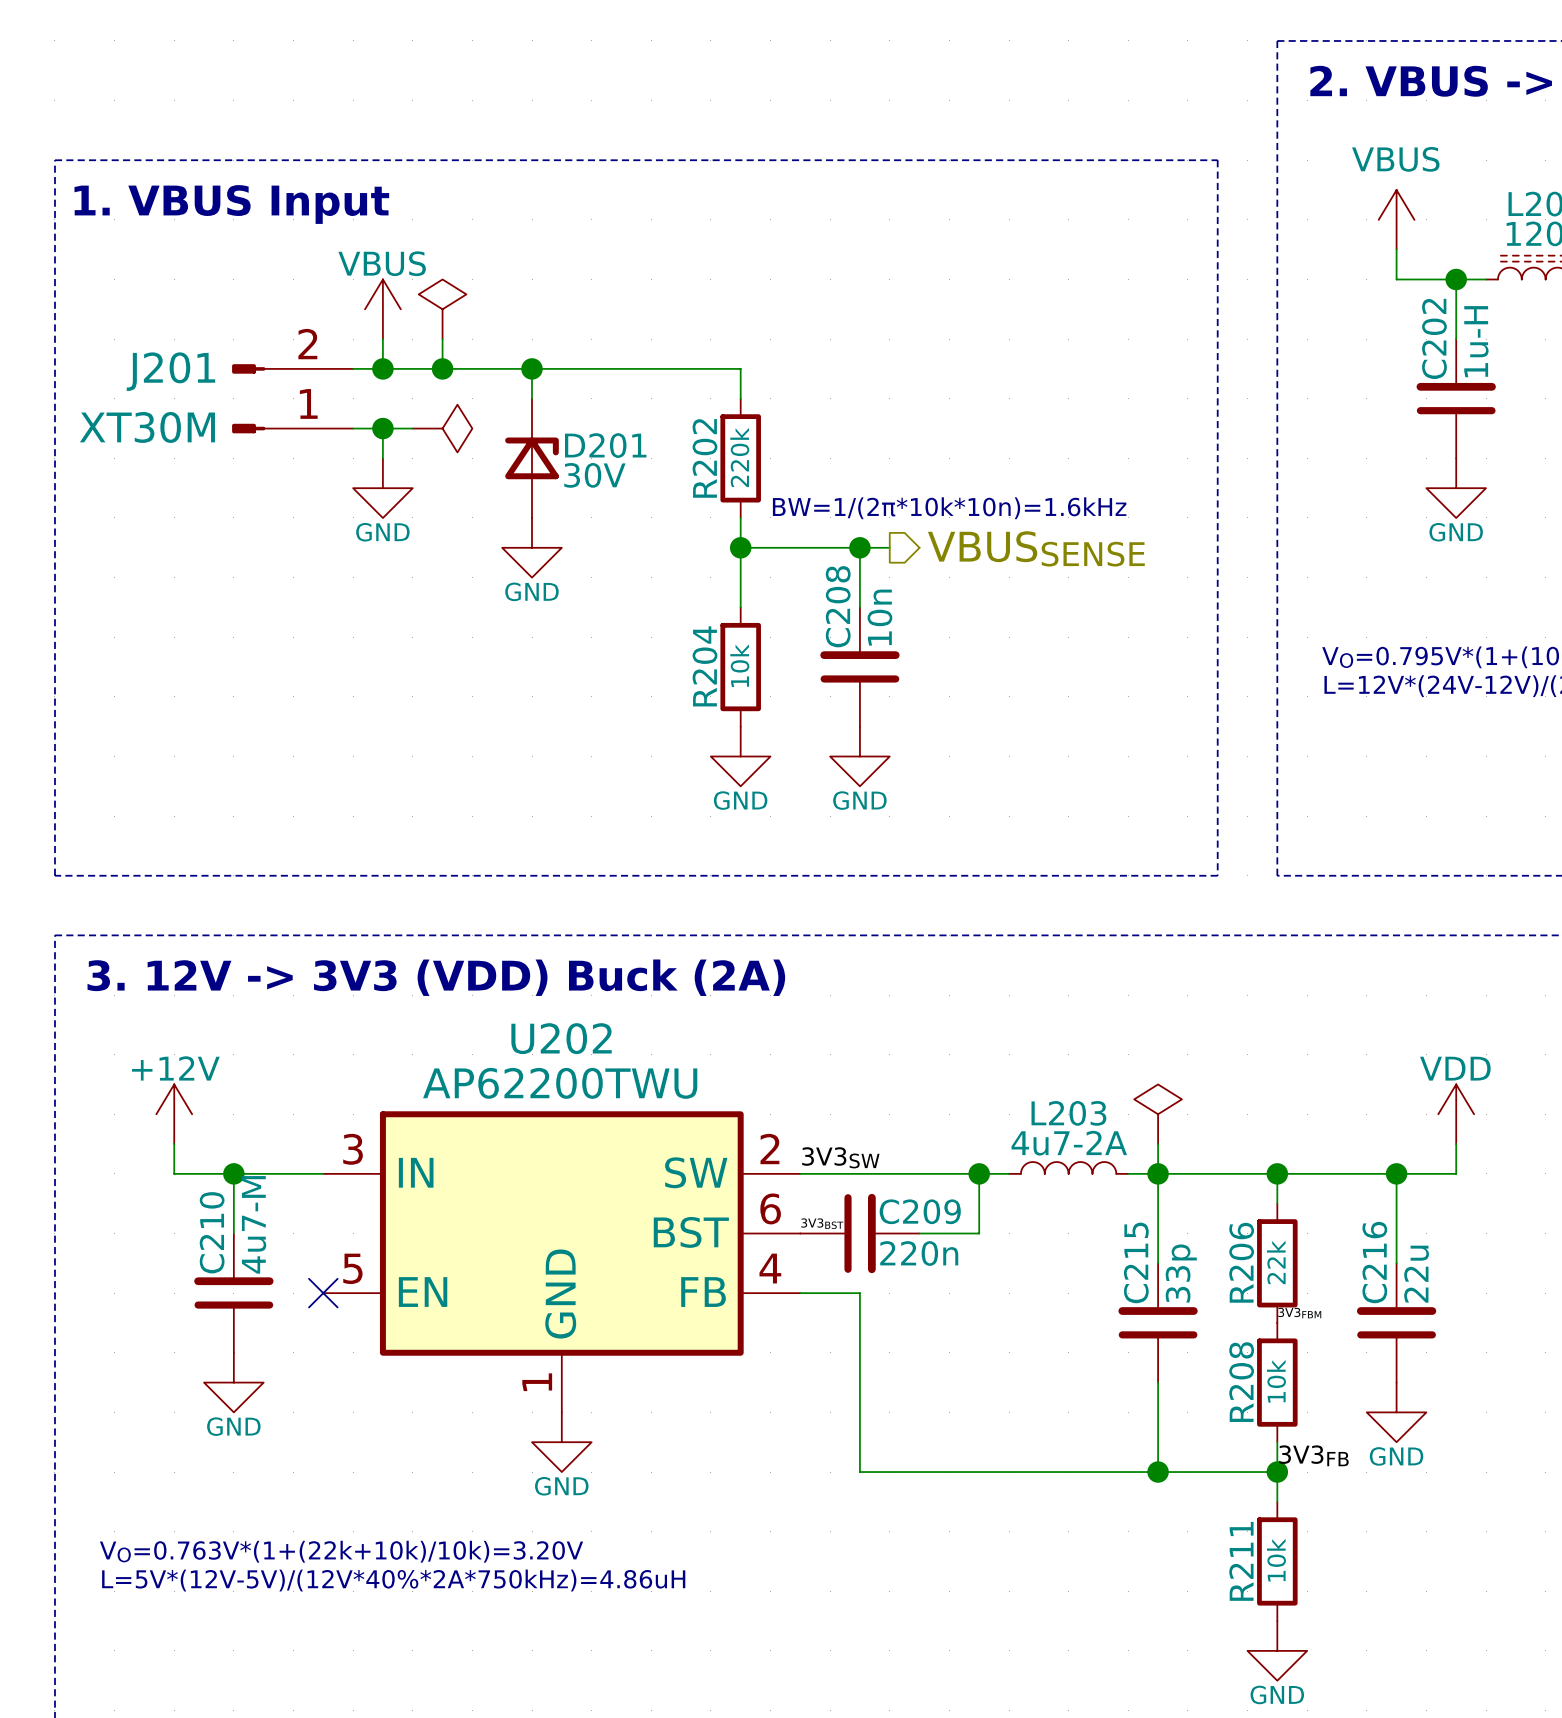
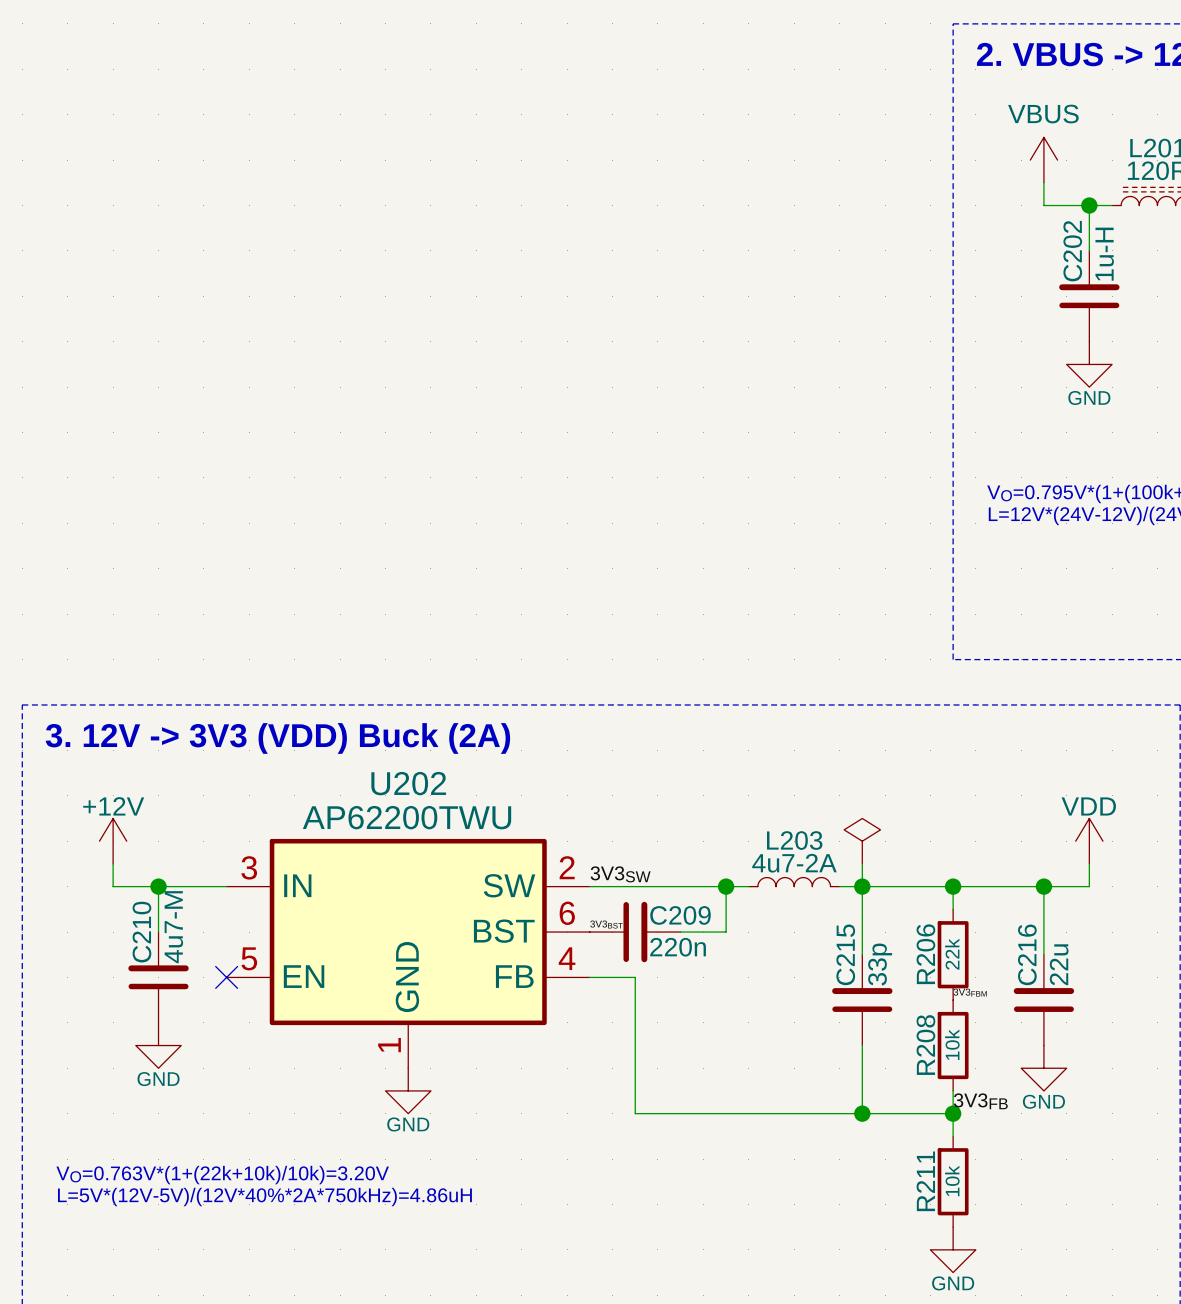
line: (54, 160) (1217, 160) (1217, 875) (54, 875) (54, 160) -> none
text: 1. VBUS Input (231, 204) -> none
power symbol: VBUS (382, 309) -> none
power symbol: (442, 309) -> none
wire: (382, 339) (382, 368) -> none
wire: (442, 339) (442, 368) -> none
wire: (353, 368) (740, 368) (740, 398) -> none
junction: (382, 368) -> none
junction: (442, 368) -> none
wire: (532, 368) (532, 398) -> none
junction: (532, 368) -> none
J201: XT30M (292, 398) -> none
wire: (353, 428) (412, 428) -> none
wire: (382, 428) (382, 458) -> none
junction: (382, 428) -> none
power symbol: (442, 428) -> none
D201: 30V (532, 458) -> none
R202: 220k (740, 458) -> none
power symbol: GND (382, 488) -> none
text: BW=1/(2π*10k*10n)=1.6kHz (949, 508) -> none
wire: (740, 517) (740, 607) -> none
power symbol: GND (532, 547) -> none
wire: (740, 547) (889, 547) -> none
junction: (740, 547) -> none
wire: (859, 547) (859, 607) -> none
junction: (859, 547) -> none
hierarchical label: VBUSSENSE (1036, 548) -> none
R204: 10k (740, 667) -> none
C208: 10n (859, 667) -> none
power symbol: GND (740, 756) -> none
power symbol: GND (859, 756) -> none

